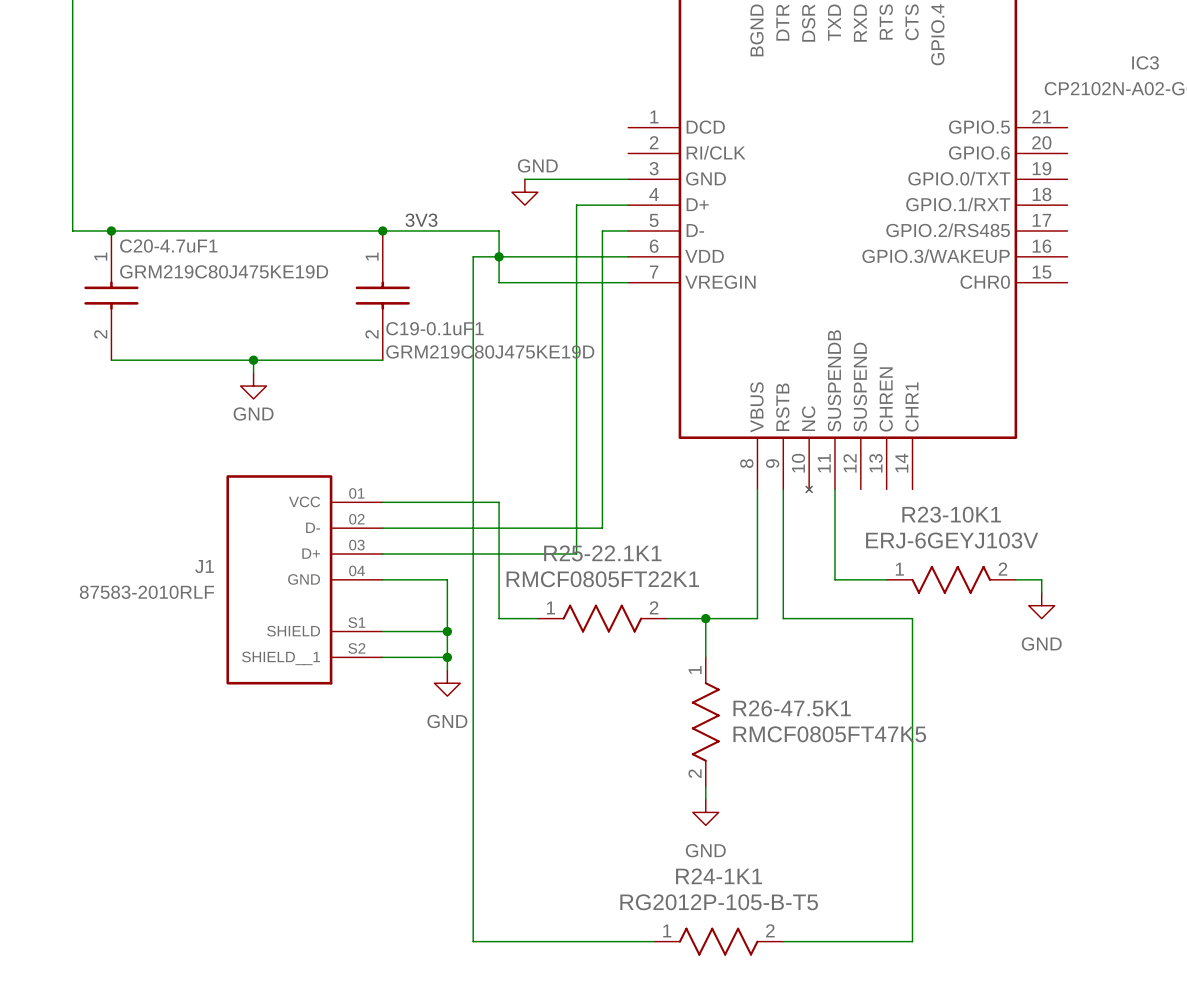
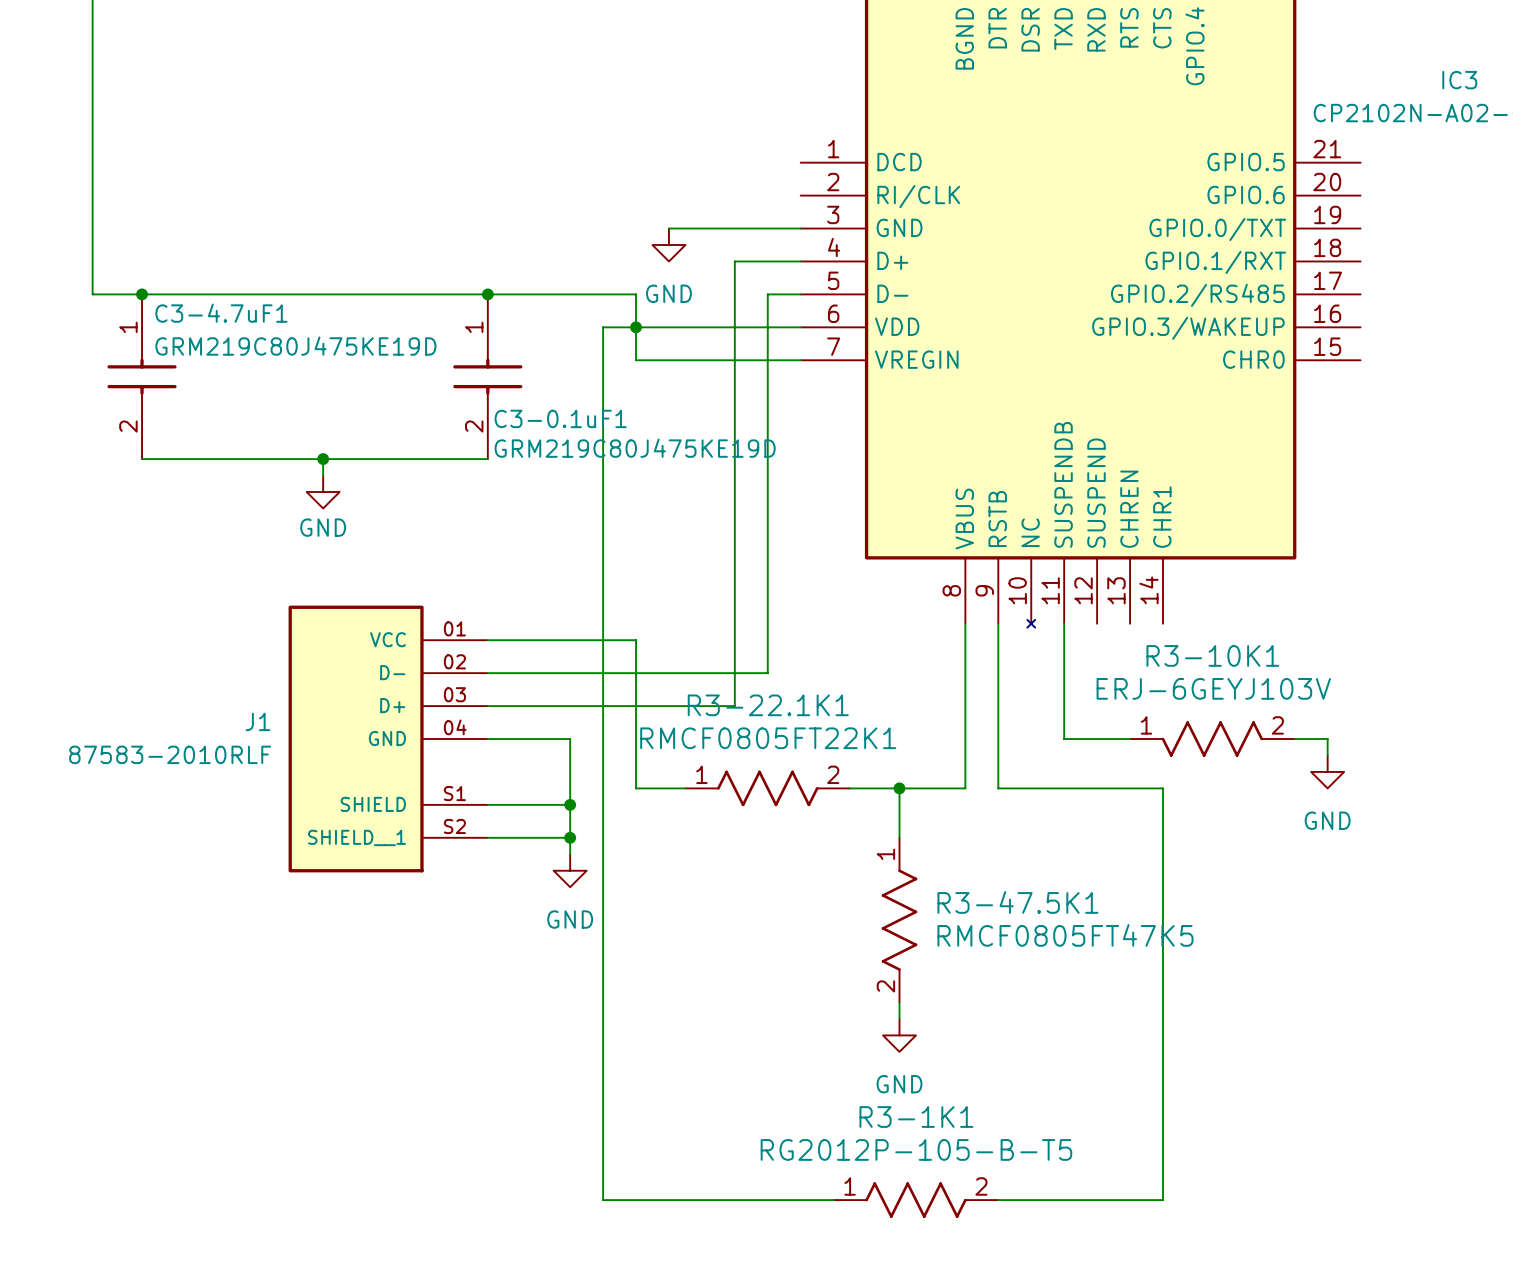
power symbol text position: GND (537, 165) -> GND (668, 293)
text: 3V3 (421, 220) -> none
C20-4.7uF1 name: C20-4.7uF1 (168, 246) -> C3-4.7uF1 (221, 313)
C19-0.1uF1 name: C19-0.1uF1 (434, 328) -> C3-0.1uF1 (560, 418)
R23-10K1 name: R23-10K1 (951, 514) -> R3-10K1 (1212, 655)
R25-22.1K1 name: R25-22.1K1 (602, 553) -> R3-22.1K1 (768, 705)
R26-47.5K1 name: R26-47.5K1 (792, 708) -> R3-47.5K1 (1017, 902)
R24-1K1 name: R24-1K1 (719, 876) -> R3-1K1 (916, 1117)

